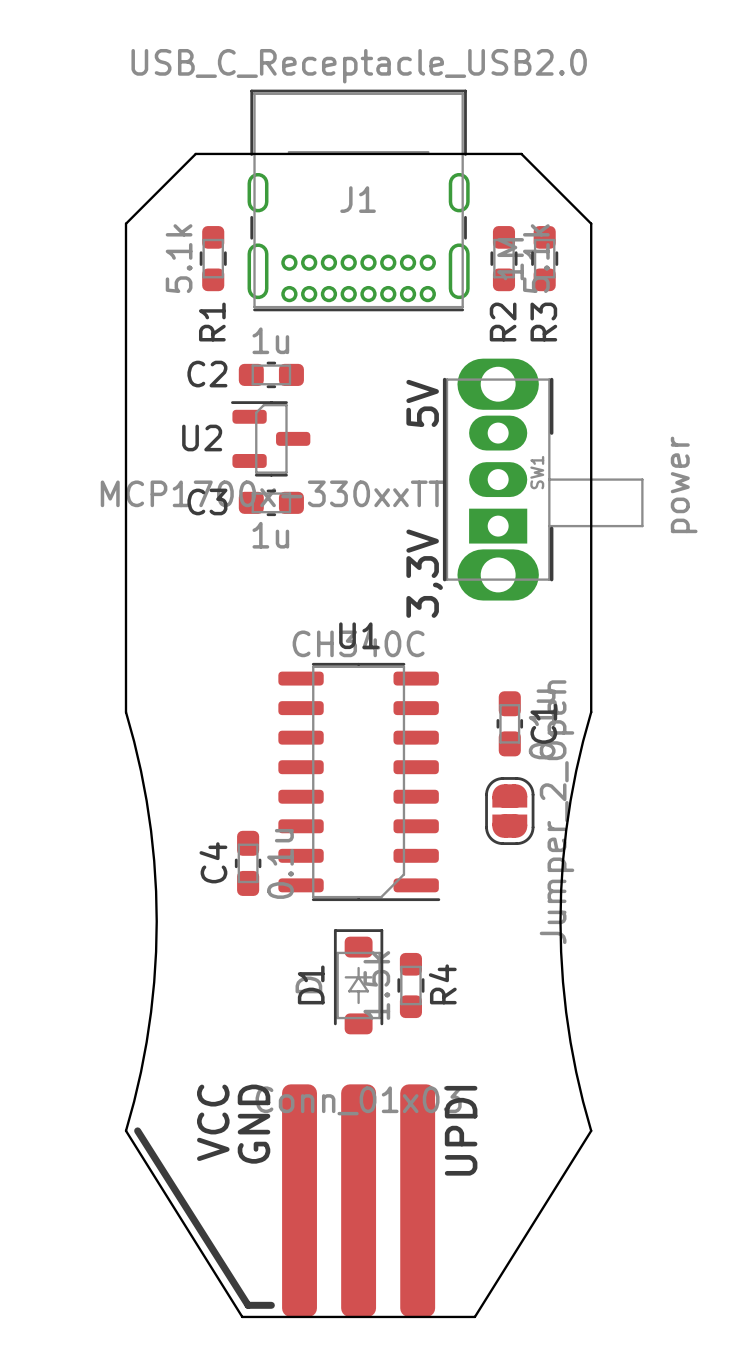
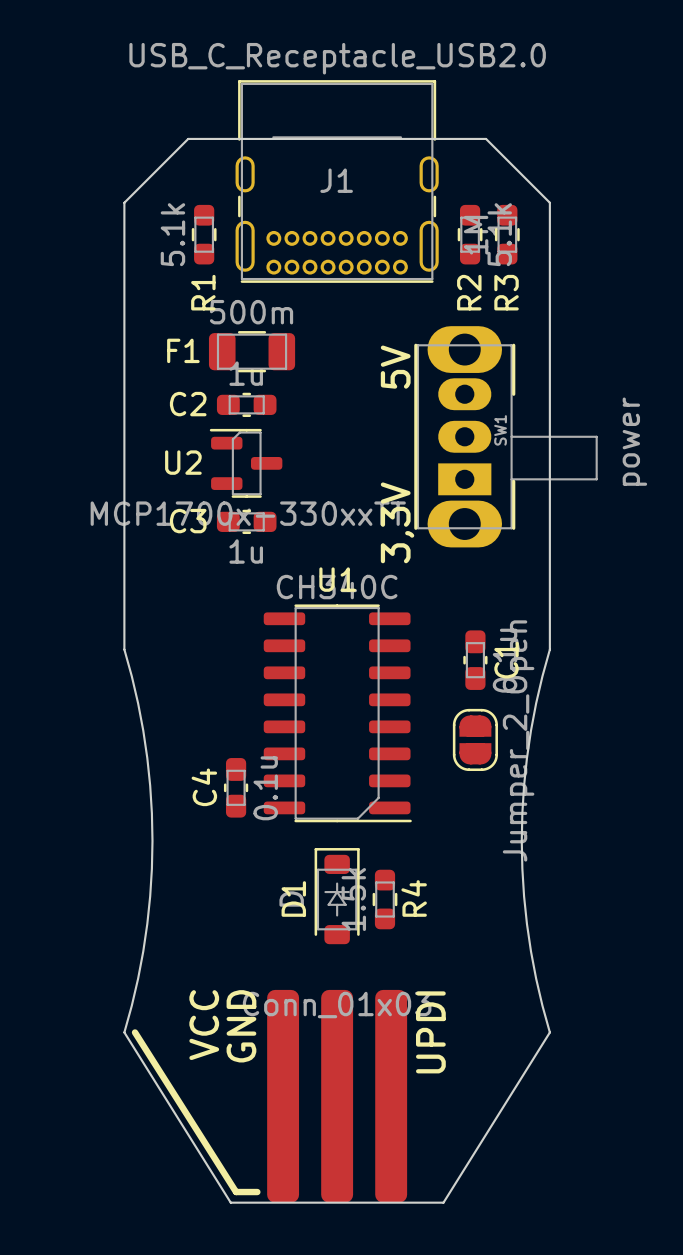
C2 position: (271, 374) -> (246, 404)
F1: none -> 500m (252, 351)
U2 position: (270, 438) -> (246, 463)
C3 position: (271, 502) -> (246, 521)

